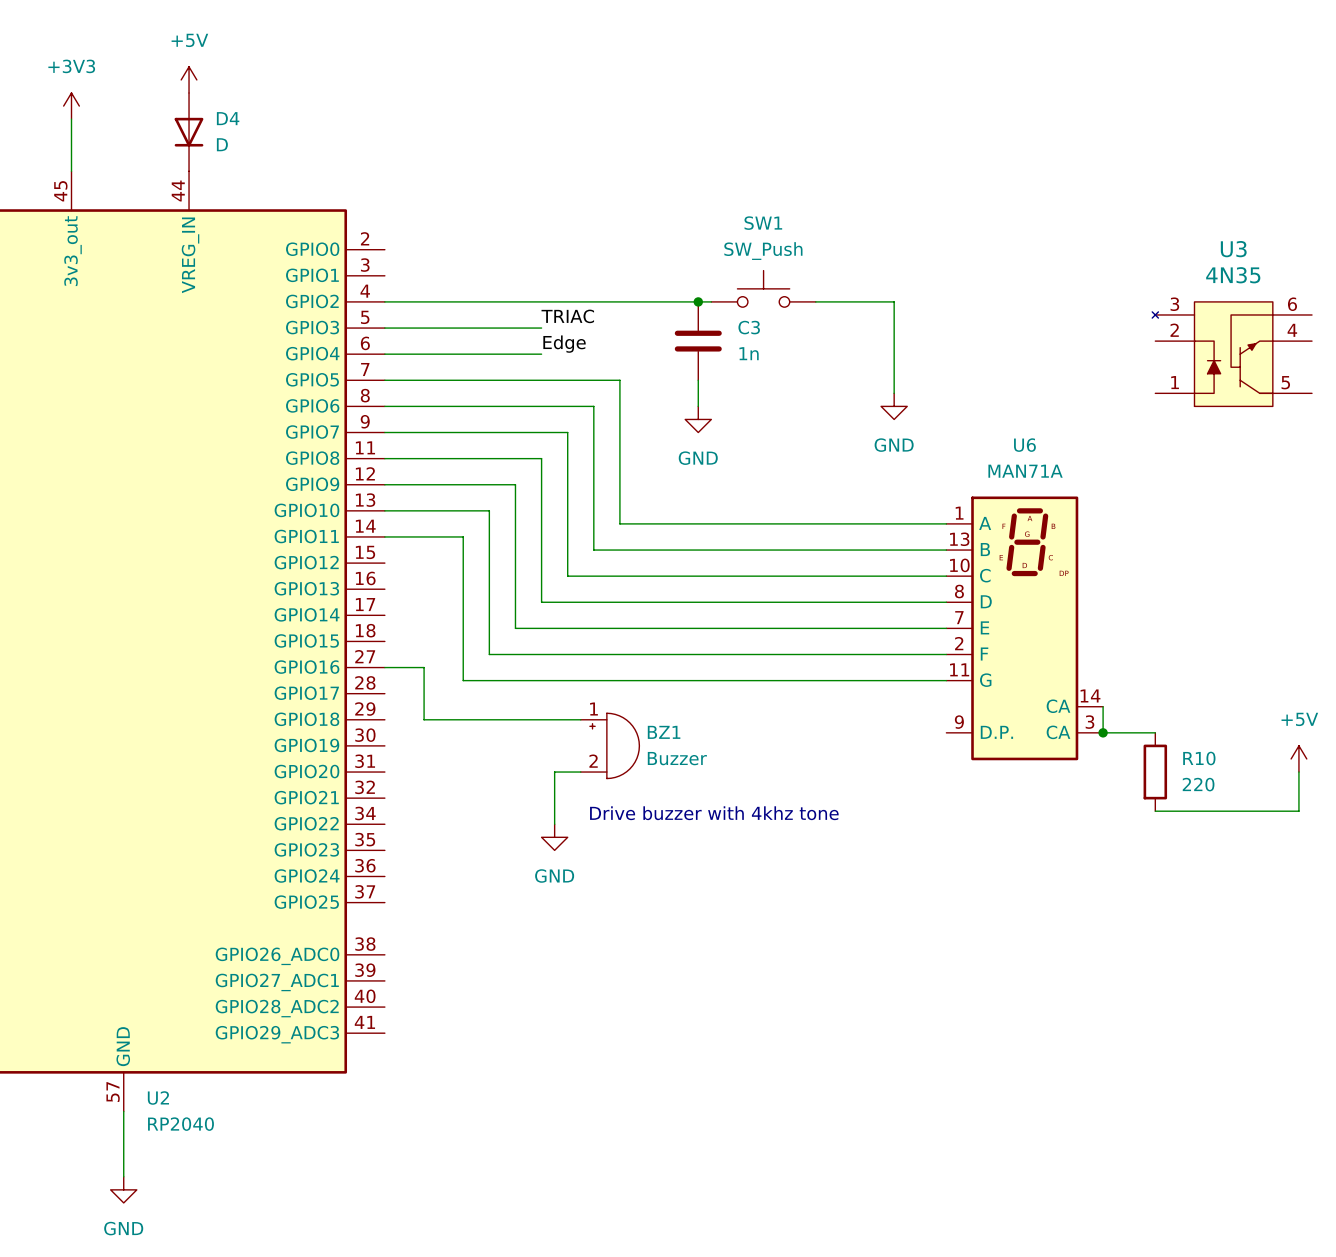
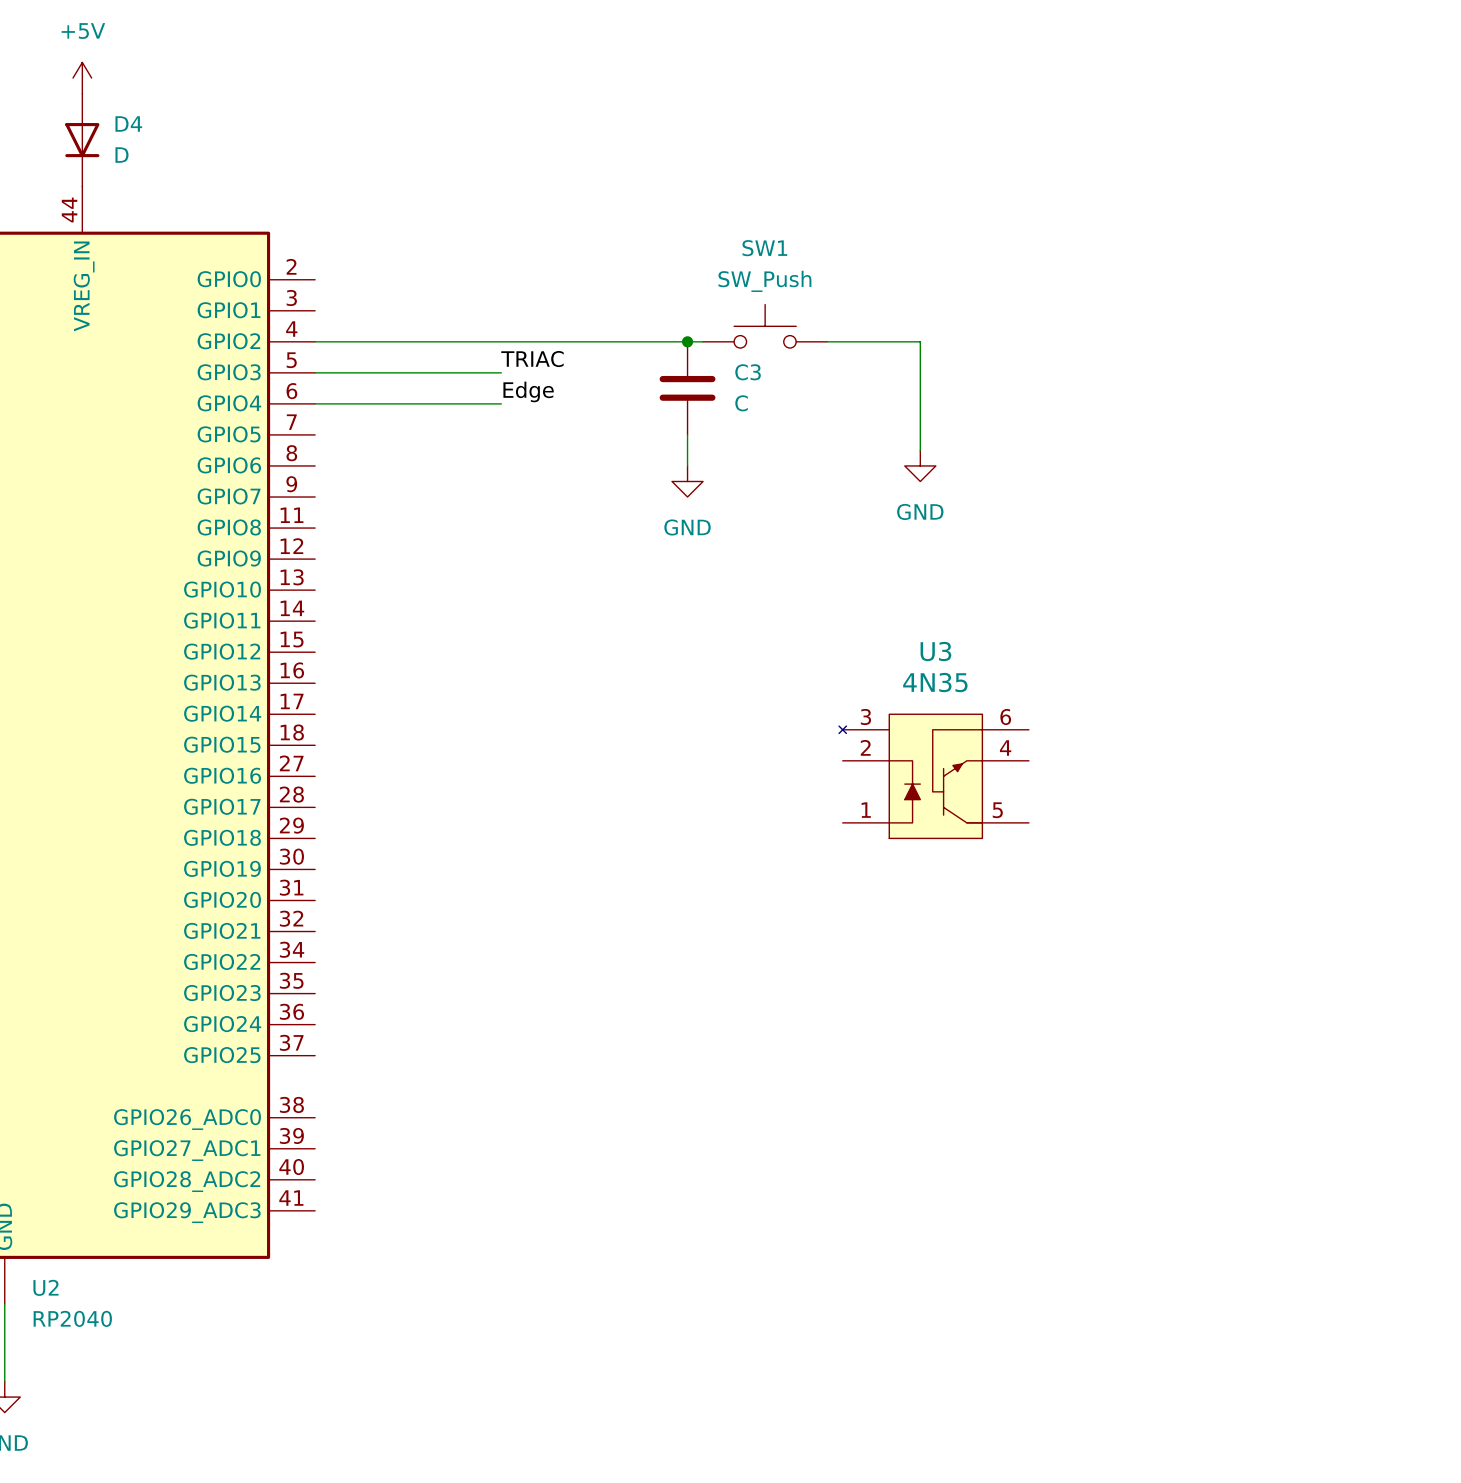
C3 value: 1n (749, 353) -> C (741, 403)
U3 position: (1232, 354) -> (934, 776)
wire: (384, 380) (619, 380) (619, 523) (946, 523) -> none
wire: (384, 406) (593, 406) (593, 550) (946, 550) -> none
wire: (384, 432) (567, 432) (567, 576) (946, 576) -> none
wire: (384, 458) (541, 458) (541, 602) (946, 602) -> none
wire: (384, 484) (515, 484) (515, 628) (946, 628) -> none
wire: (384, 510) (489, 510) (489, 654) (946, 654) -> none
wire: (384, 536) (463, 536) (463, 680) (946, 680) -> none
U6: MAN71A (1024, 628) -> none
wire: (384, 667) (424, 667) (424, 719) (580, 719) -> none
wire: (1103, 706) (1103, 732) (1155, 732) -> none
junction: (1103, 732) -> none
BZ1: Buzzer (610, 745) -> none
power symbol: +5V (1298, 758) -> none
wire: (580, 772) (554, 772) (554, 824) -> none
R10: 220 (1155, 772) -> none
wire: (1298, 772) (1298, 811) (1155, 811) -> none
text: Drive buzzer with 4khz tone (714, 813) -> none
power symbol: GND (554, 837) -> none

